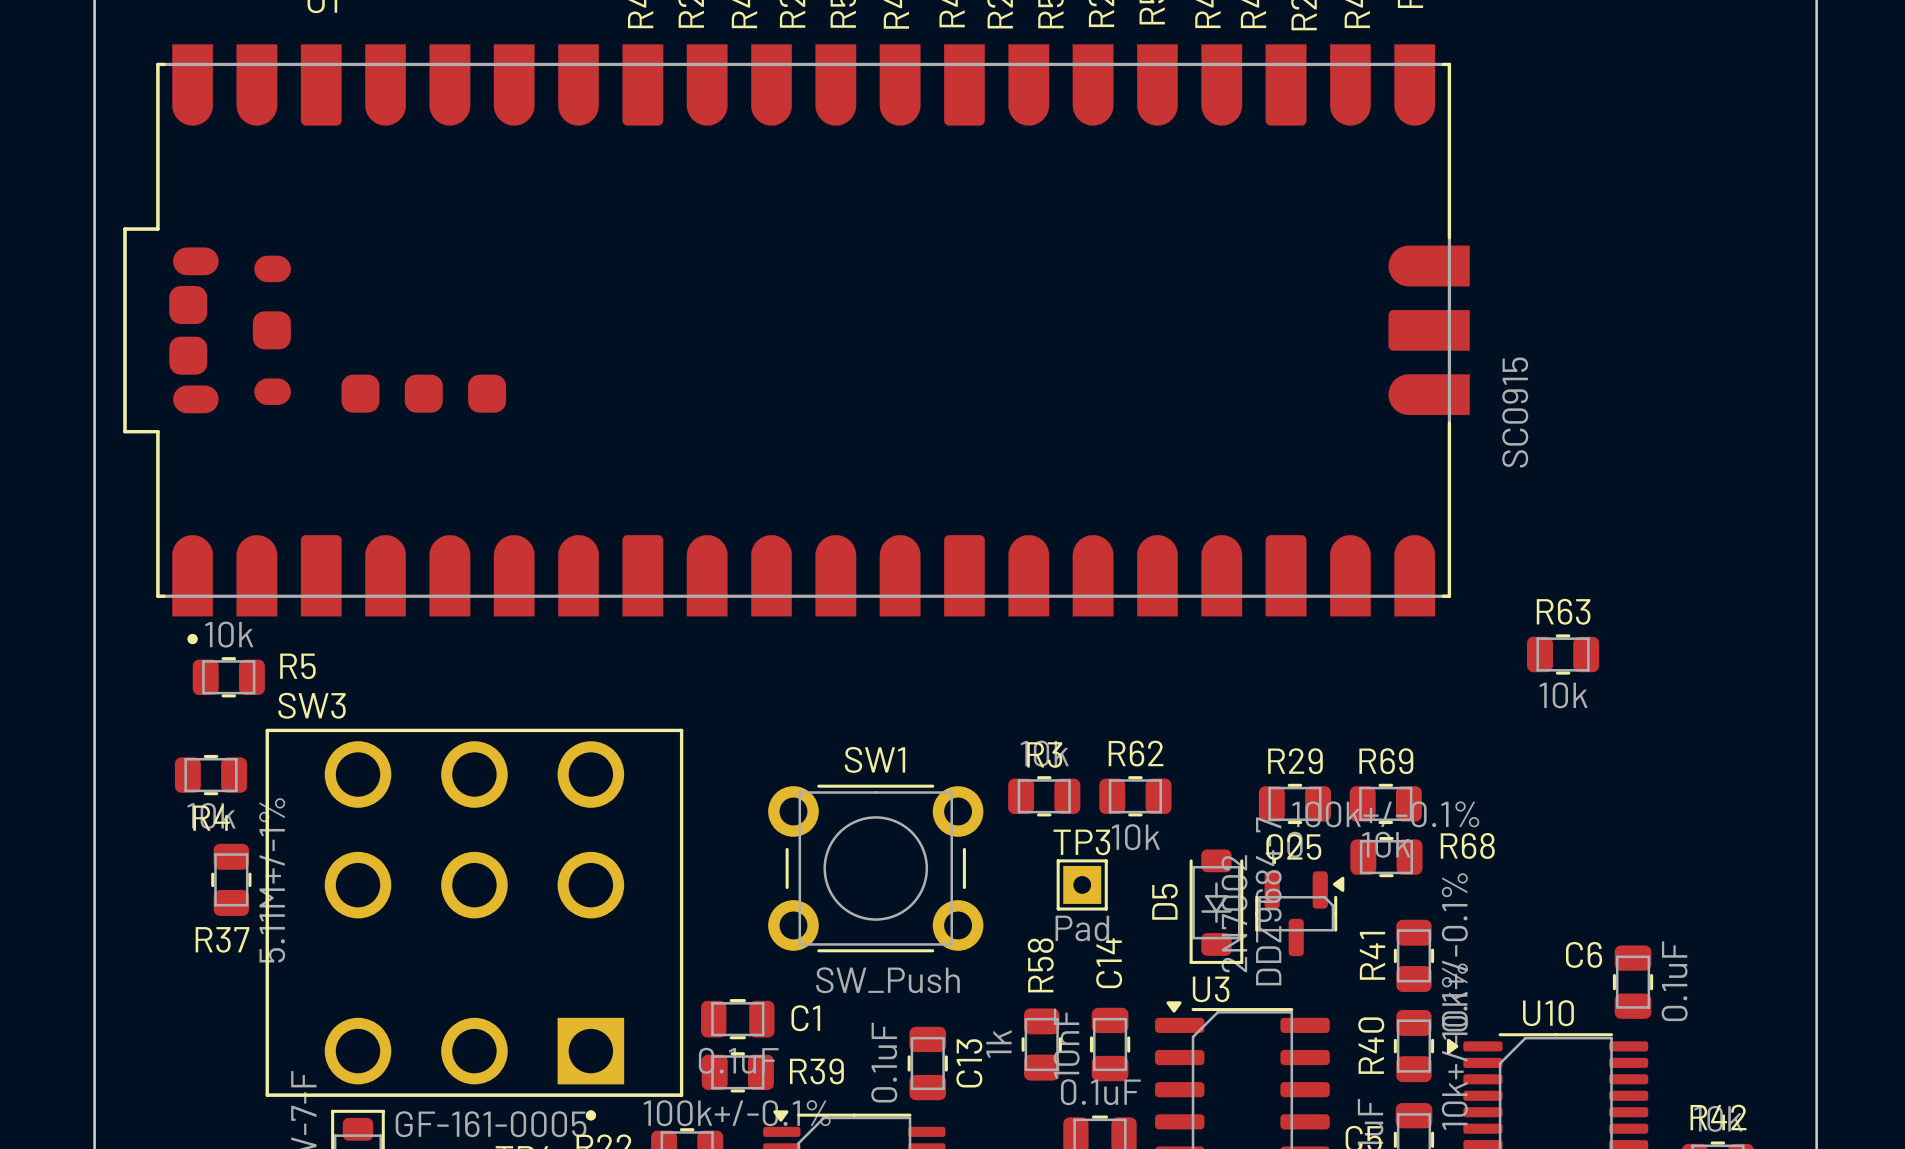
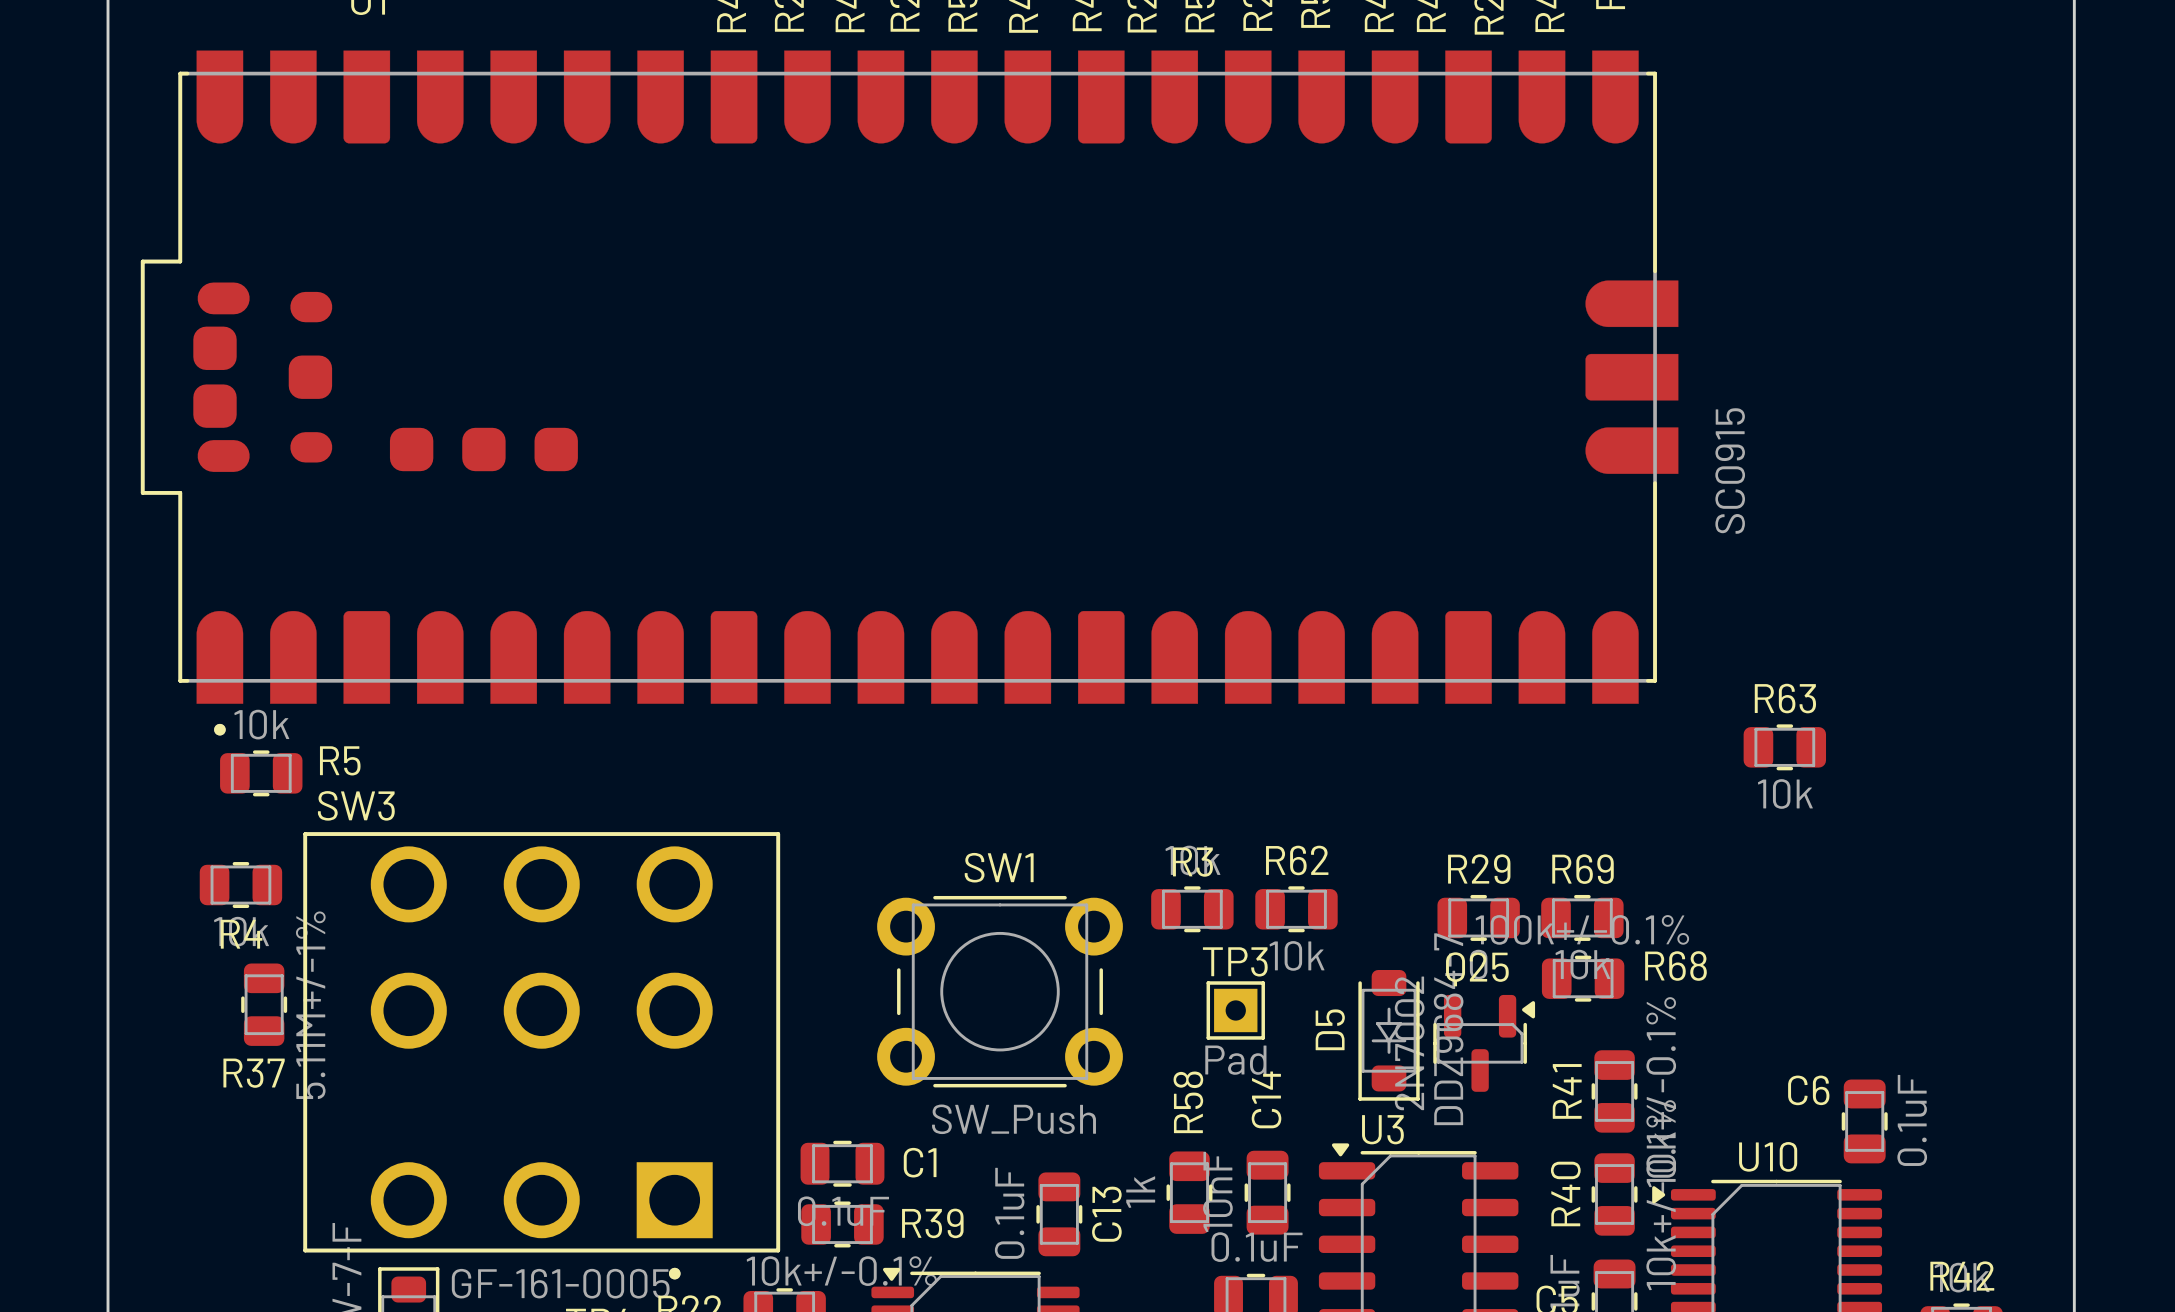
R39 value: 100k+/-0.1% (737, 1113) -> 10k+/-0.1% (841, 1271)

